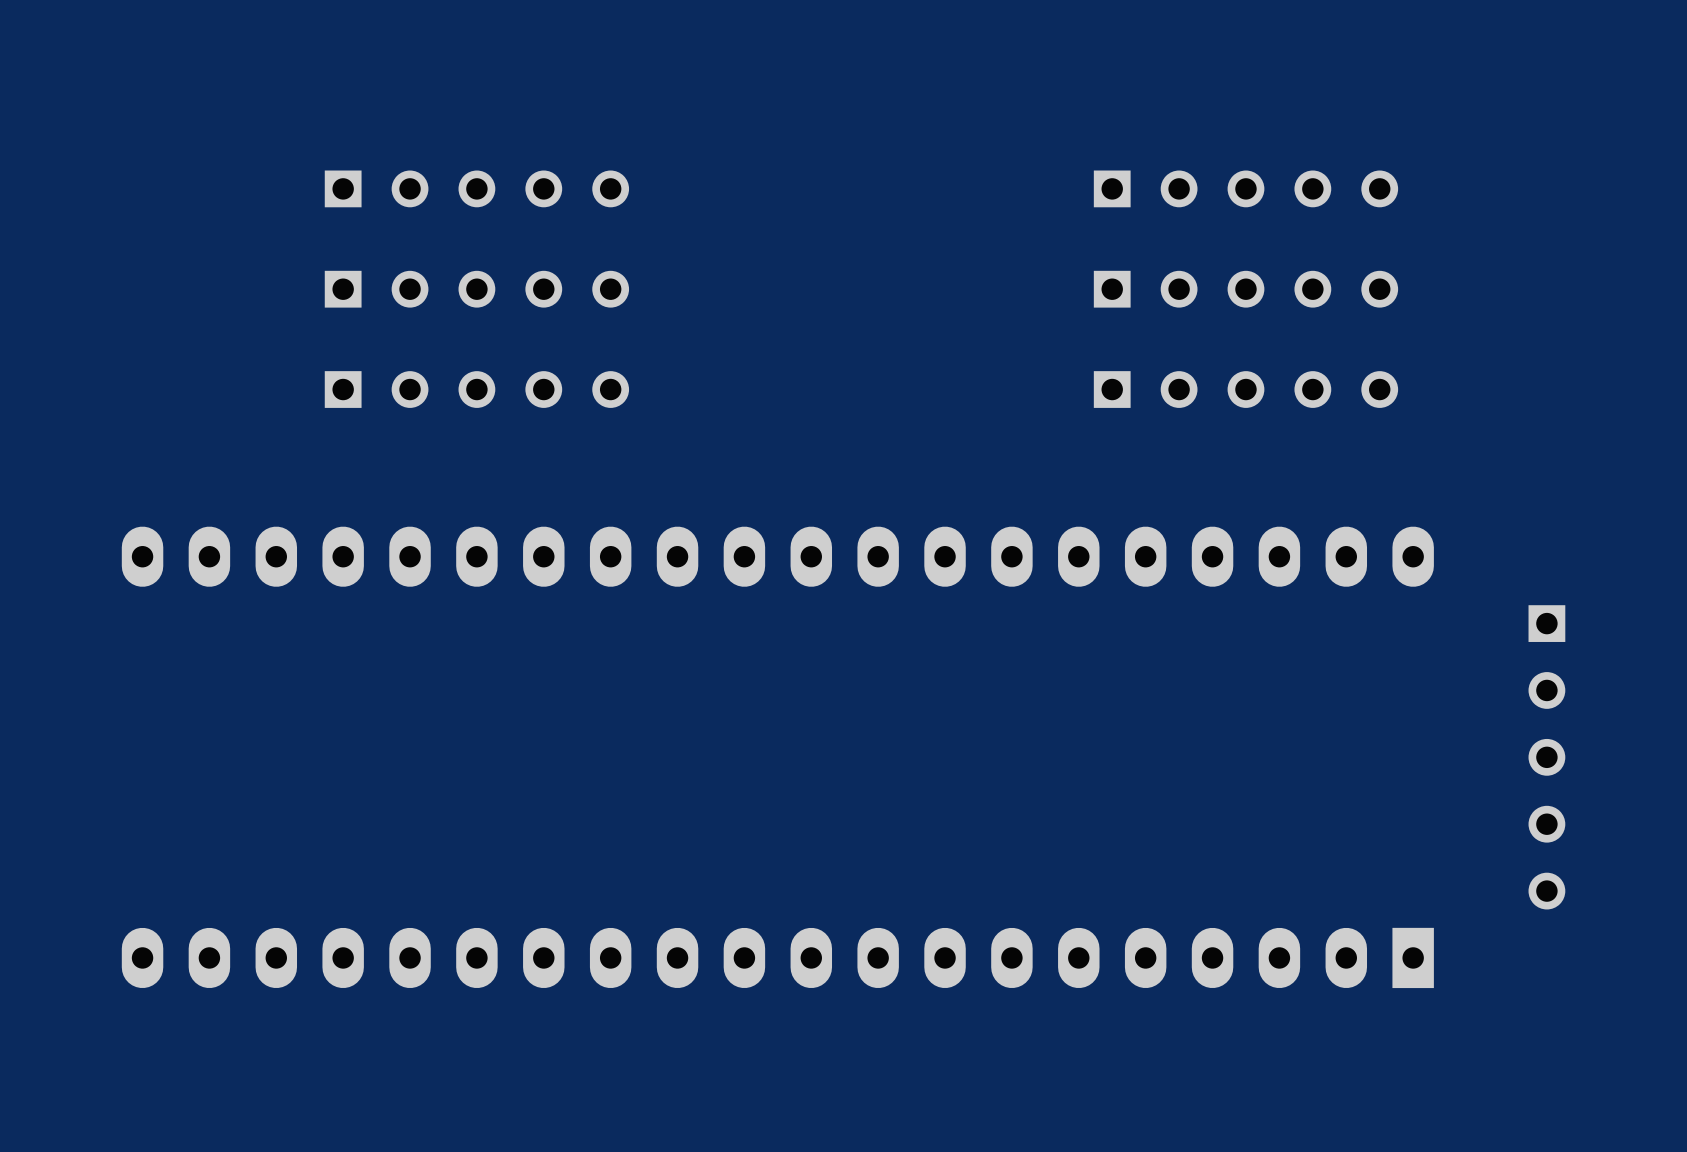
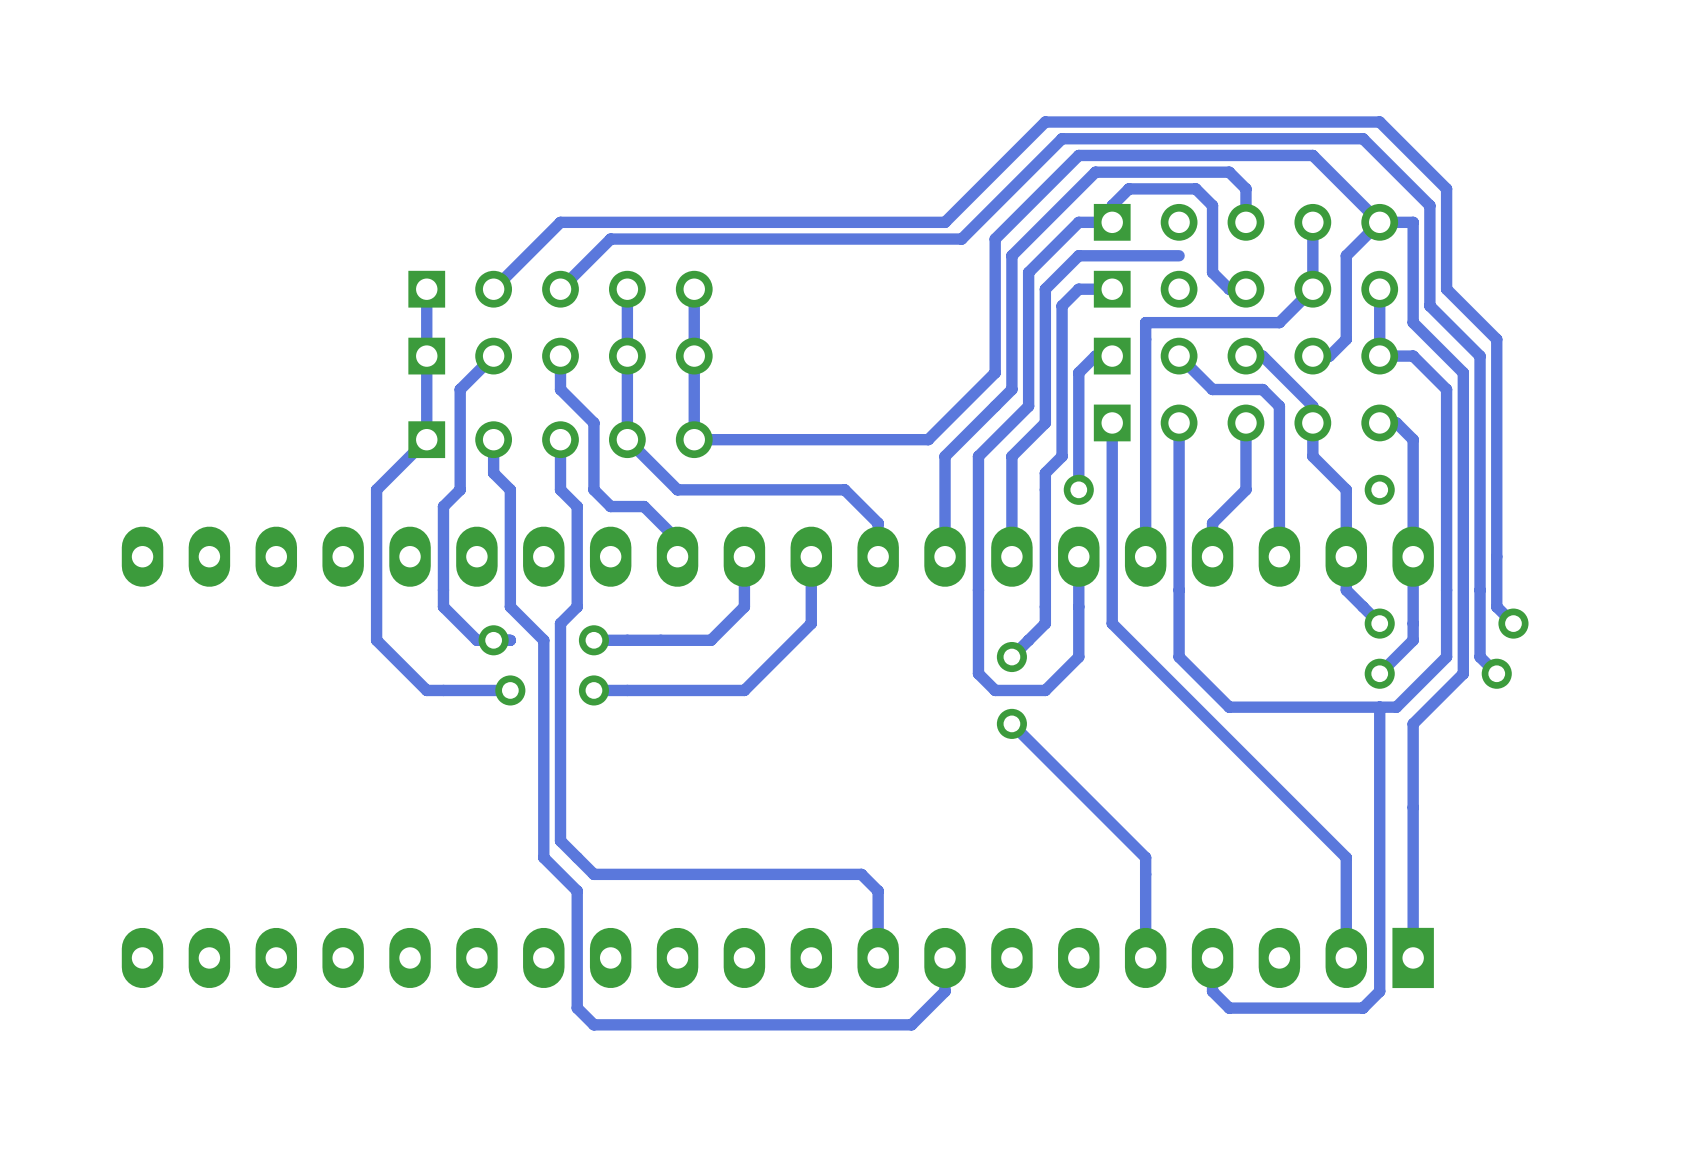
part: (476, 188) -> none
part position: (1245, 188) -> (1245, 222)
track: none -> (1245, 222) (1245, 188) (1229, 172) (1095, 172) (1011, 255) (1011, 389) (945, 456) (945, 556)
track: none -> (1312, 222) (1312, 289) (1279, 322) (1145, 322) (1145, 556)
track: none -> (1379, 222) (1413, 222) (1413, 322) (1463, 372) (1463, 673) (1413, 723) (1413, 957)
track: none -> (1379, 222) (1312, 155) (1078, 155) (995, 239) (995, 372) (928, 439) (694, 439) (694, 289)
track: none -> (1379, 222) (1346, 255) (1346, 339) (1329, 356) (1312, 356)
track: none -> (1179, 255) (1078, 255) (1045, 289) (1045, 422) (1011, 456) (1011, 556)
track: none -> (426, 289) (426, 439) (376, 489) (376, 640) (426, 690) (510, 690)
part: (476, 289) -> none
track: none -> (493, 289) (560, 222) (945, 222) (1045, 122) (1379, 122) (1446, 188) (1446, 289) (1496, 339) (1496, 606) (1513, 623)
track: none -> (560, 289) (610, 239) (961, 239) (1062, 138) (1363, 138) (1429, 205) (1429, 305) (1480, 356) (1480, 657) (1496, 673)
part: none -> (560, 289)
track: none -> (627, 289) (627, 439) (677, 489) (844, 489) (878, 523) (878, 556)
track: none -> (1112, 289) (1078, 289) (1062, 305) (1062, 456) (1045, 473) (1045, 623) (1011, 657)
track: none -> (1245, 289) (1229, 289) (1212, 272) (1212, 205) (1195, 188) (1128, 188) (1112, 205) (1112, 222) (1078, 222) (1028, 272) (1028, 406) (978, 456) (978, 673) (995, 690) (1045, 690) (1078, 657) (1078, 556)
track: none -> (1379, 289) (1379, 356) (1413, 356) (1446, 389) (1446, 657) (1396, 707) (1229, 707) (1179, 657) (1179, 422)
track: none -> (493, 356) (460, 389) (460, 489) (443, 506) (443, 606) (476, 640) (510, 640)
track: none -> (560, 356) (560, 389) (593, 422) (593, 489) (610, 506) (644, 506) (677, 539) (677, 556)
part: none -> (560, 356)
track: none -> (1112, 356) (1095, 356) (1078, 372) (1078, 489)
track: none -> (1179, 356) (1212, 389) (1262, 389) (1279, 406) (1279, 556)
track: none -> (1245, 356) (1262, 356) (1312, 406) (1312, 456) (1346, 489) (1346, 590) (1379, 623)
part: none -> (1245, 356)
part: (476, 389) -> none
part: (1245, 389) -> none
track: none -> (1112, 422) (1112, 623) (1346, 857) (1346, 957)
track: none -> (1245, 422) (1245, 489) (1212, 523) (1212, 556)
part: none -> (1245, 422)
track: none -> (1379, 422) (1396, 422) (1413, 439) (1413, 640) (1379, 673)
track: none -> (493, 439) (493, 473) (510, 489) (510, 606) (543, 640) (543, 857) (577, 891) (577, 1008) (593, 1024) (911, 1024) (945, 991) (945, 957)
track: none -> (560, 439) (560, 489) (577, 506) (577, 606) (560, 623) (560, 840) (593, 874) (861, 874) (878, 891) (878, 957)
part: none -> (560, 439)
via: none -> (1078, 489)
via: none -> (1379, 489)
track: none -> (744, 556) (744, 606) (710, 640) (593, 640)
track: none -> (811, 556) (811, 623) (744, 690) (593, 690)
via: none -> (1379, 623)
via: none -> (1513, 623)
via: none -> (493, 640)
via: none -> (593, 640)
via: none -> (1011, 657)
via: none -> (1379, 673)
via: none -> (1496, 673)
via: none -> (510, 690)
via: none -> (593, 690)
track: none -> (1379, 707) (1379, 991) (1363, 1008) (1229, 1008) (1212, 991) (1212, 957)
track: none -> (1011, 723) (1145, 857) (1145, 957)
via: none -> (1011, 723)
part: (1546, 757) -> none

